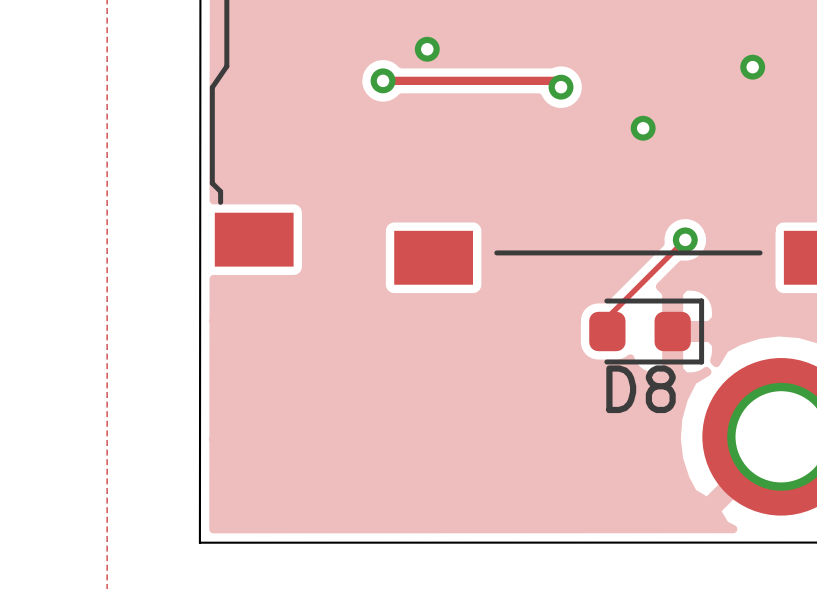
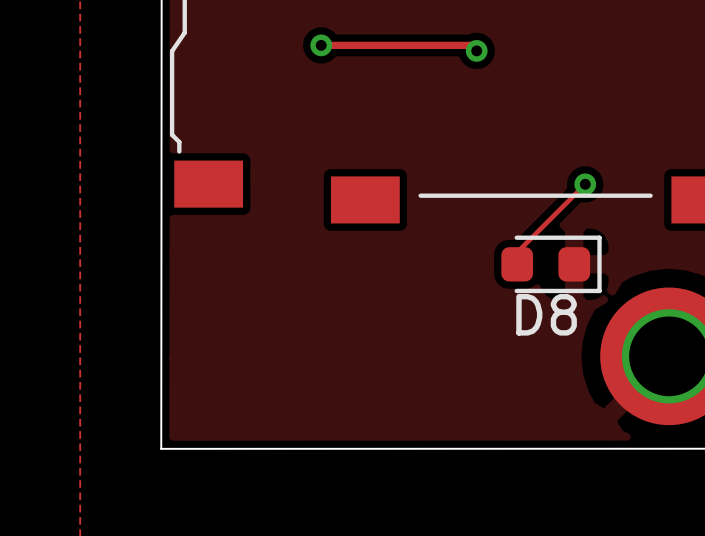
via: (427, 49) -> none
via: (752, 67) -> none
via: (643, 128) -> none

